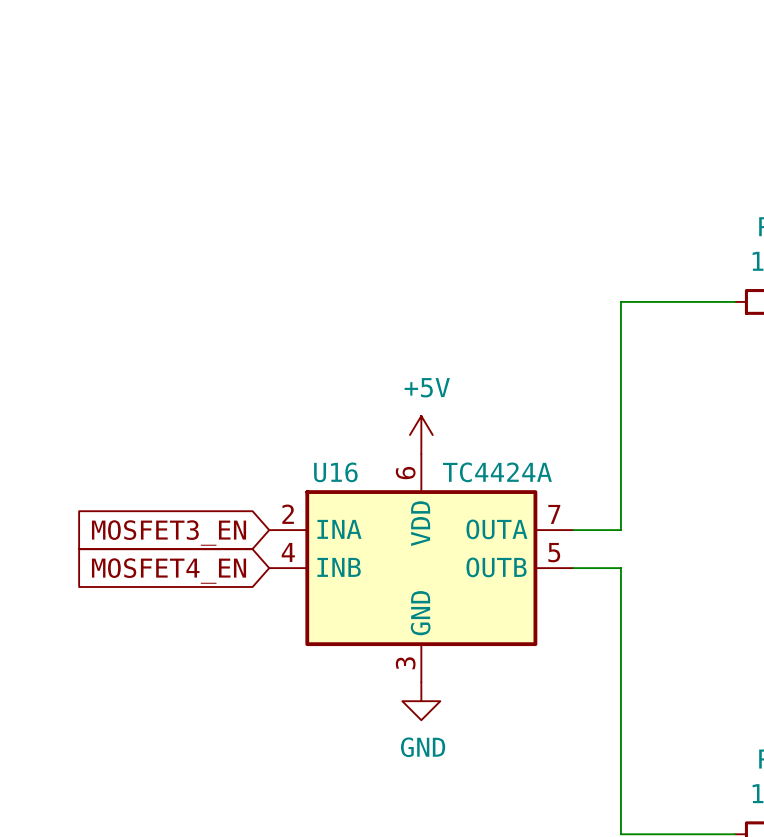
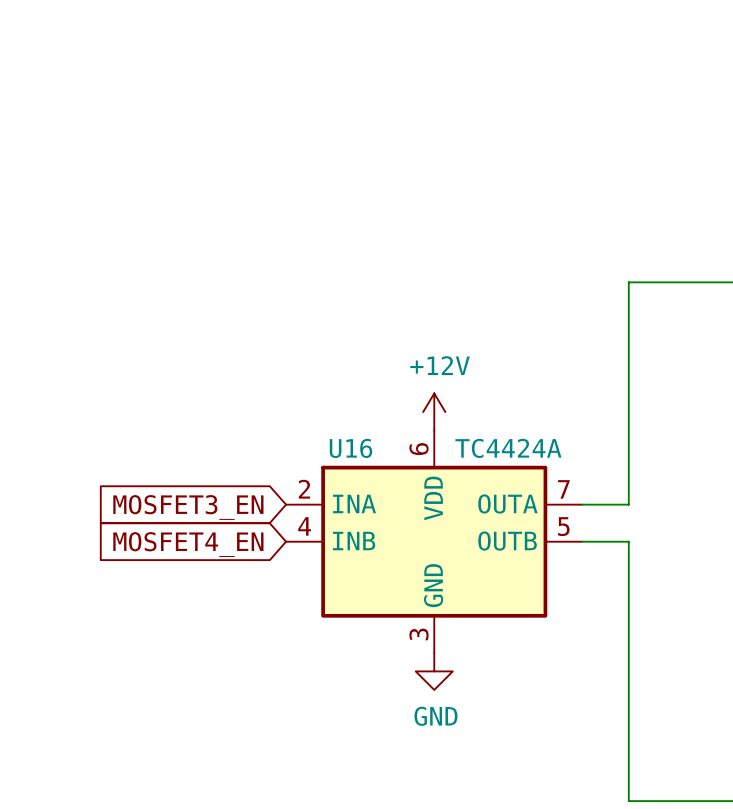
power symbol: +5V (421, 435) -> +12V (434, 412)

